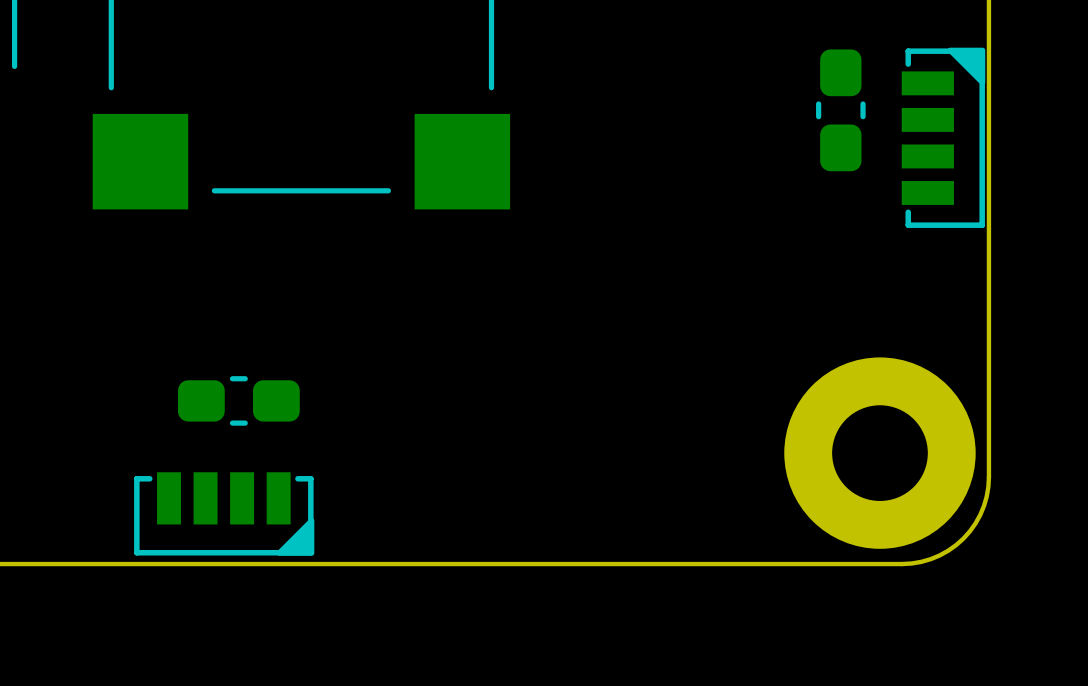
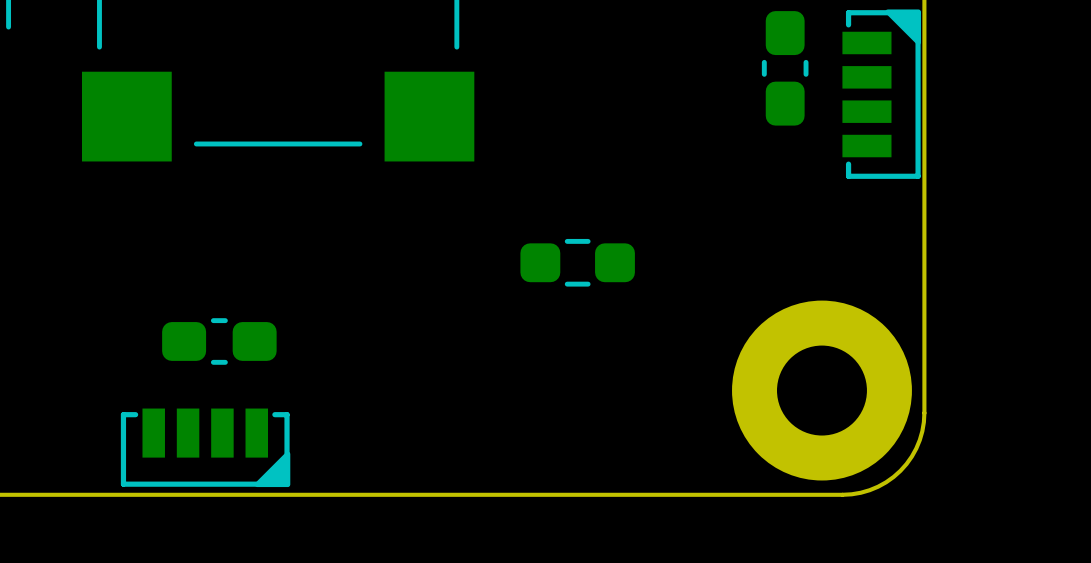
part: none -> (577, 262)

